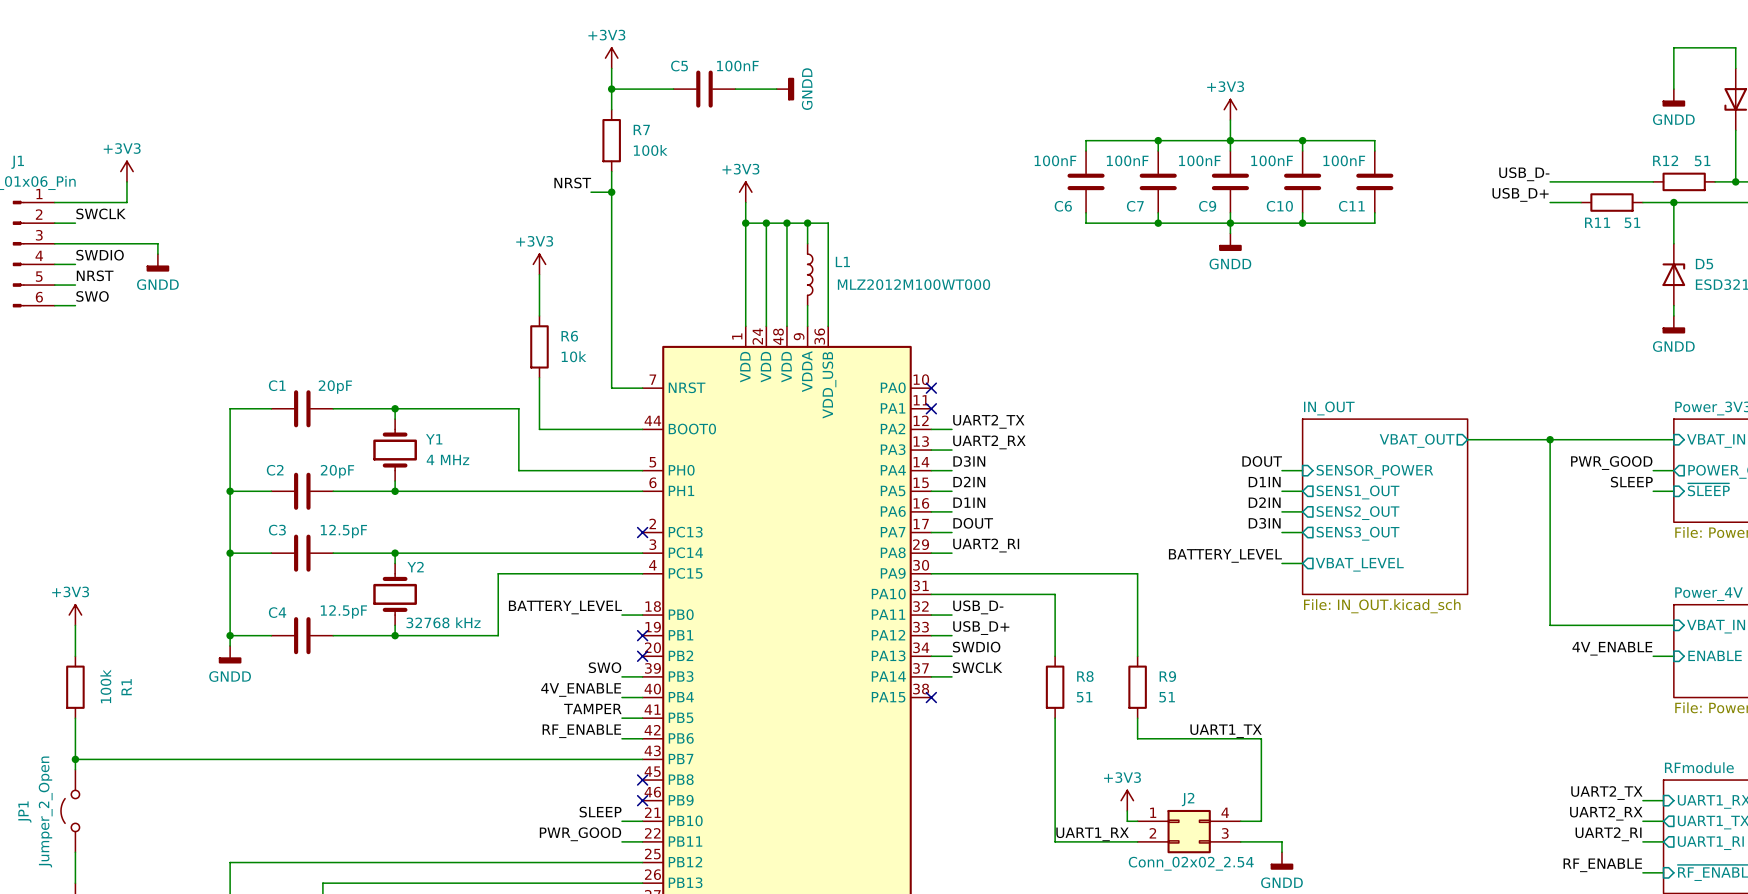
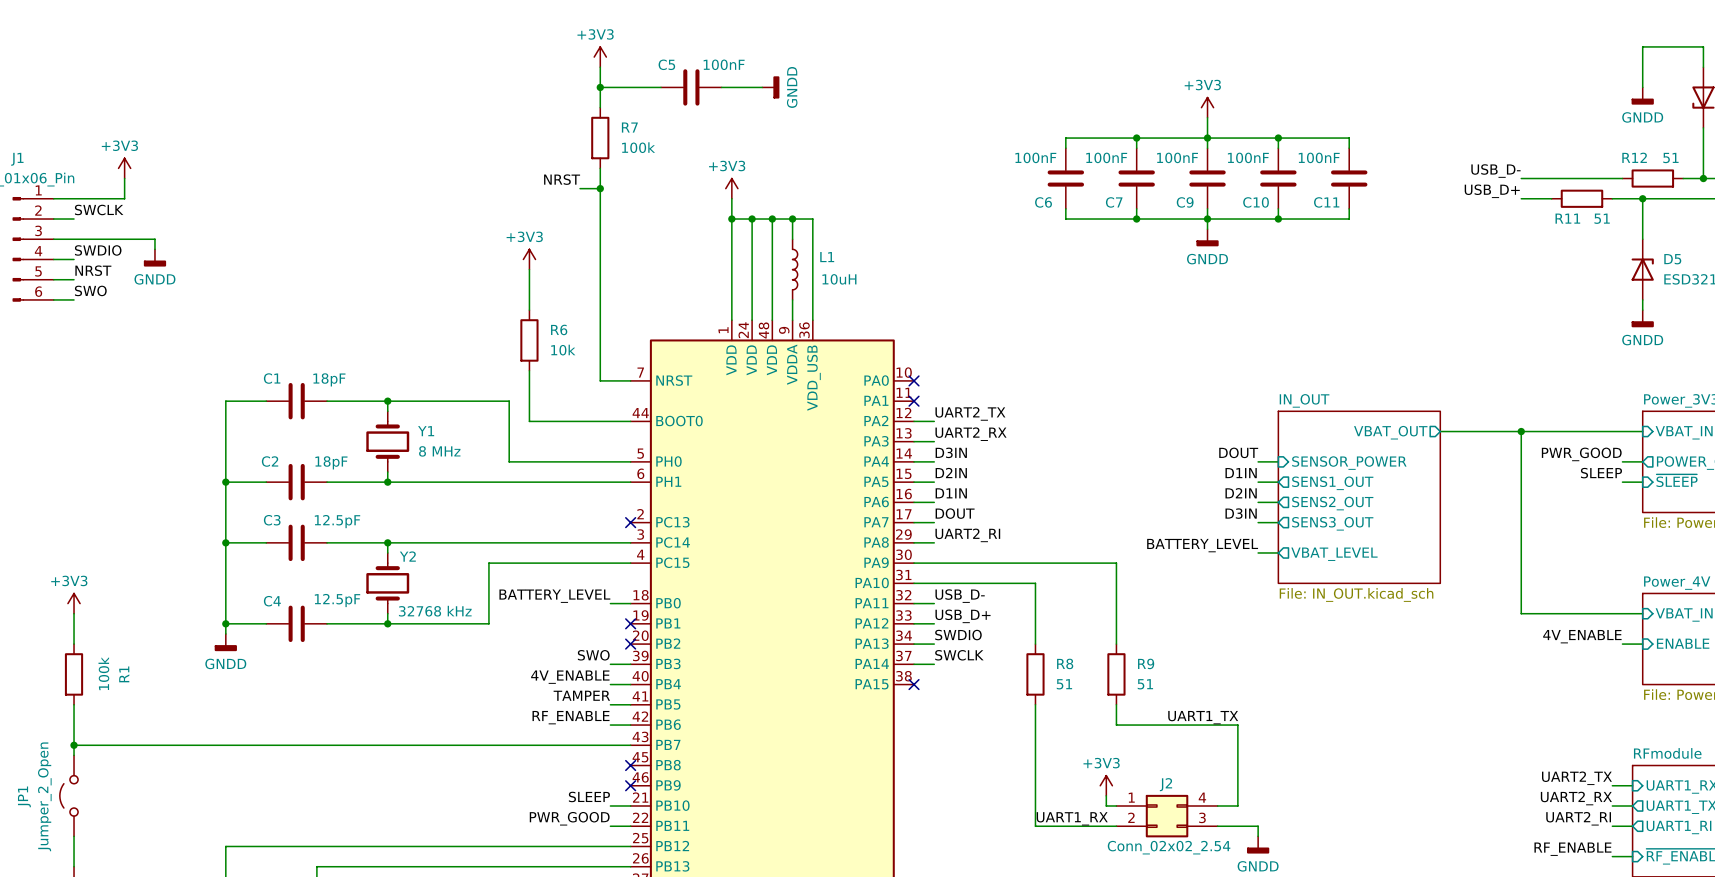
L1 value: MLZ2012M100WT000 (914, 284) -> 10uH (839, 279)
C1 value: 20pF (335, 387) -> 18pF (329, 379)
Y1 value: 4 MHz (447, 459) -> 8 MHz (439, 451)
C2 value: 20pF (337, 471) -> 18pF (331, 462)

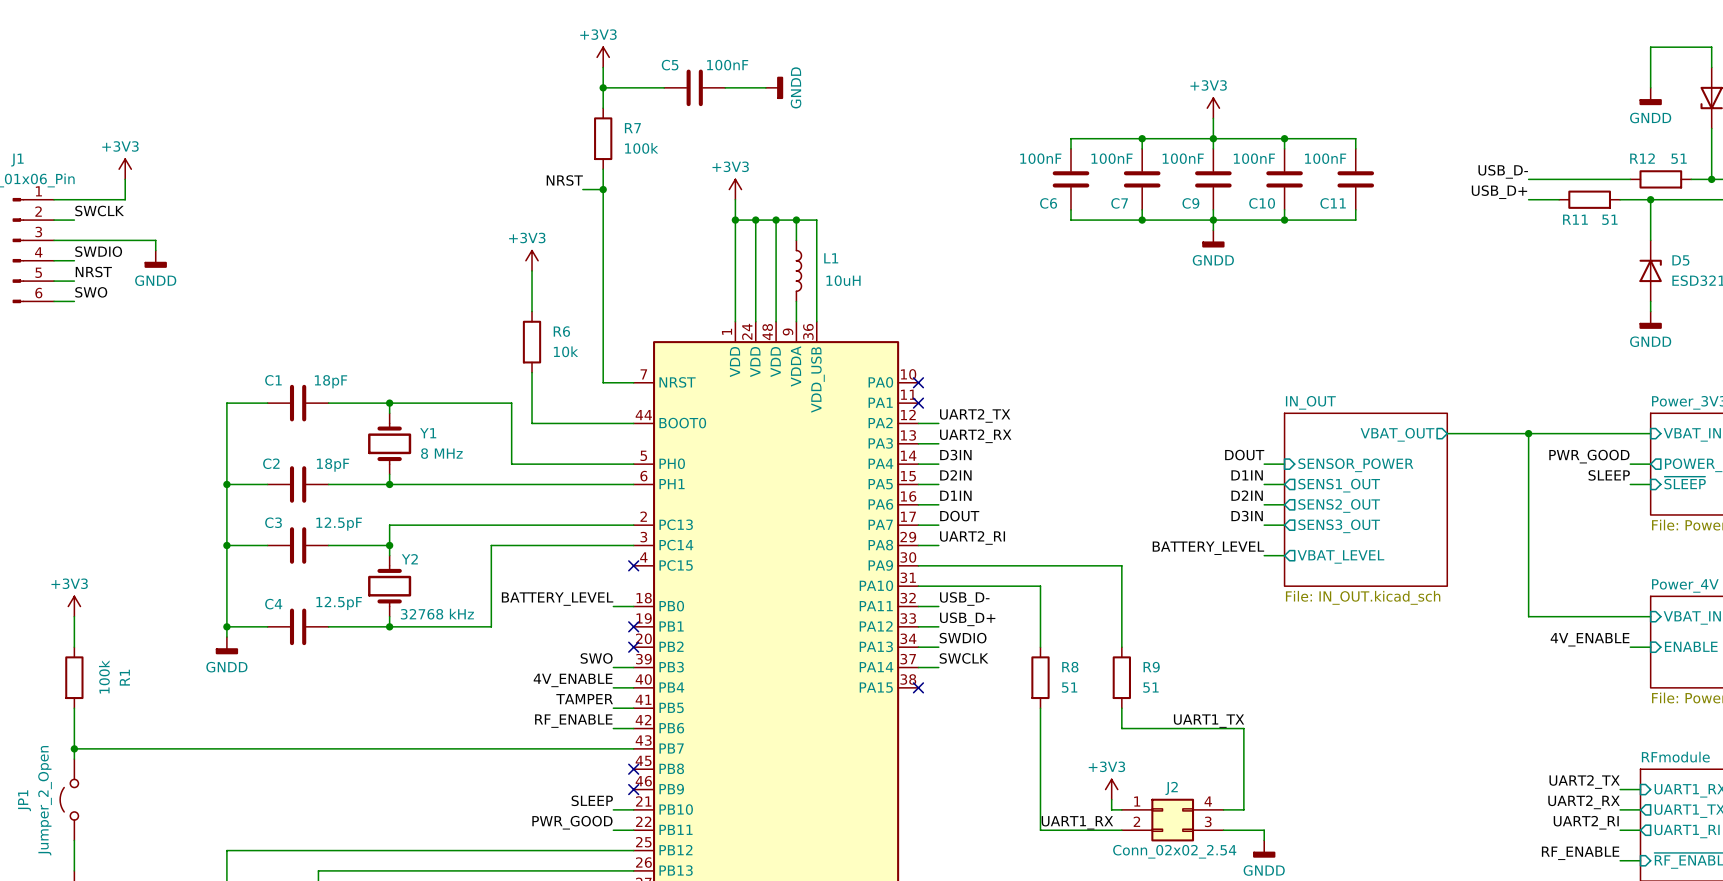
wire: none -> (633, 525) (389, 525) (389, 545)
no-connect mark position: (630, 522) -> (633, 565)
wire: (387, 542) (488, 542) -> (491, 565) (491, 545)
wire: (488, 563) (630, 563) -> none

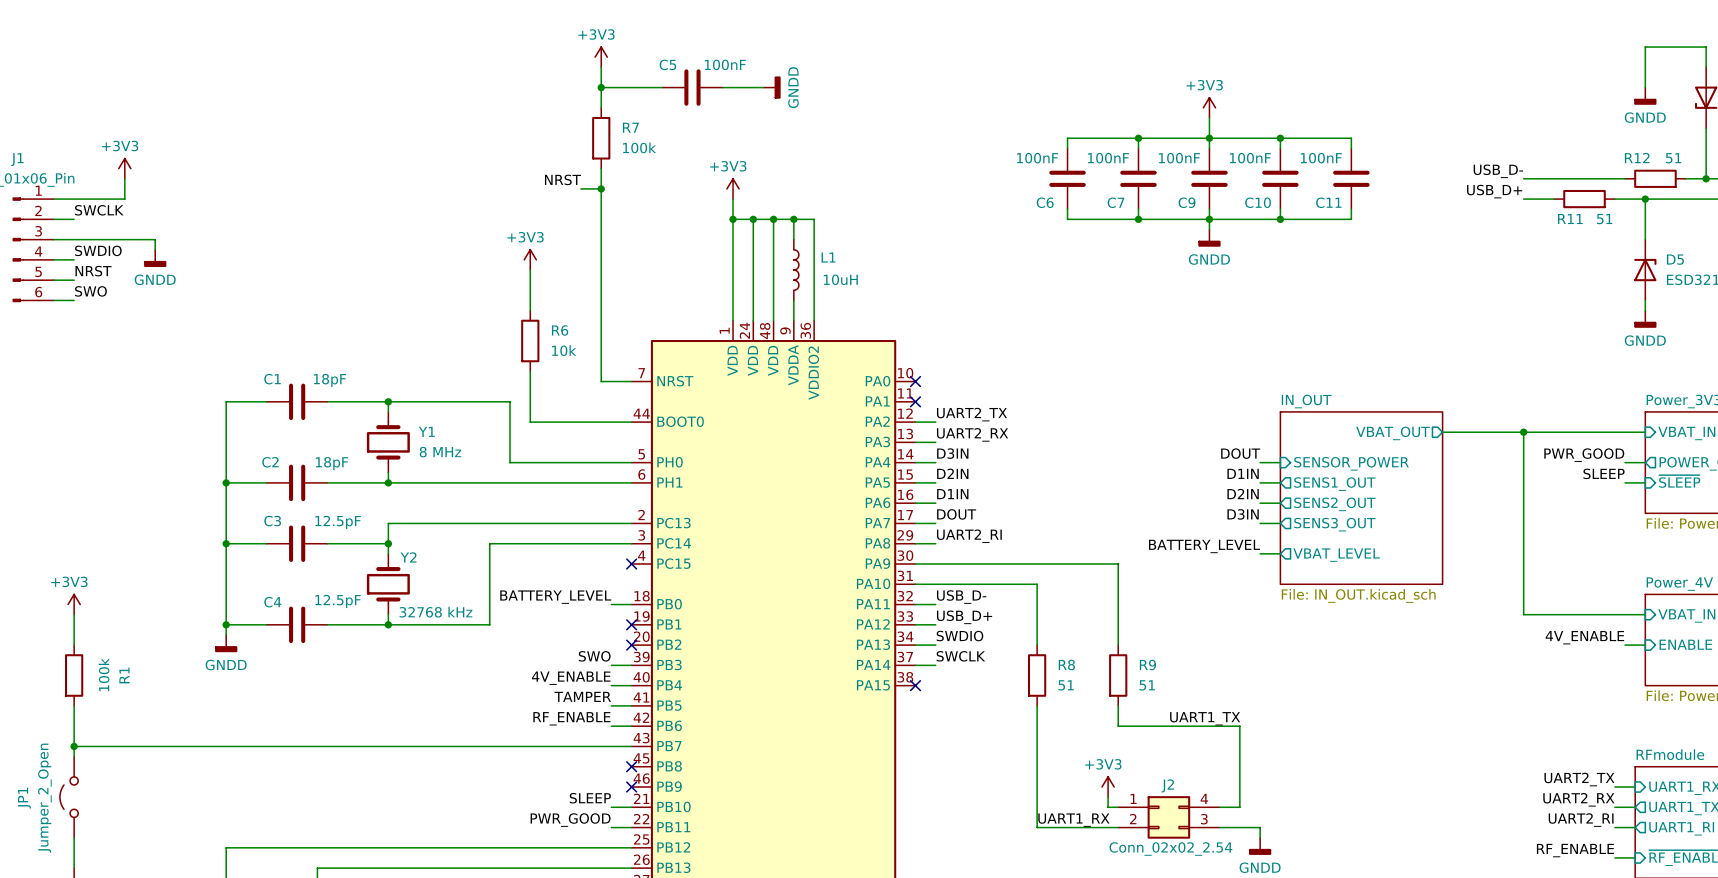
part pin name: VDD_USB (817, 379) -> VDDIO2 (813, 373)

